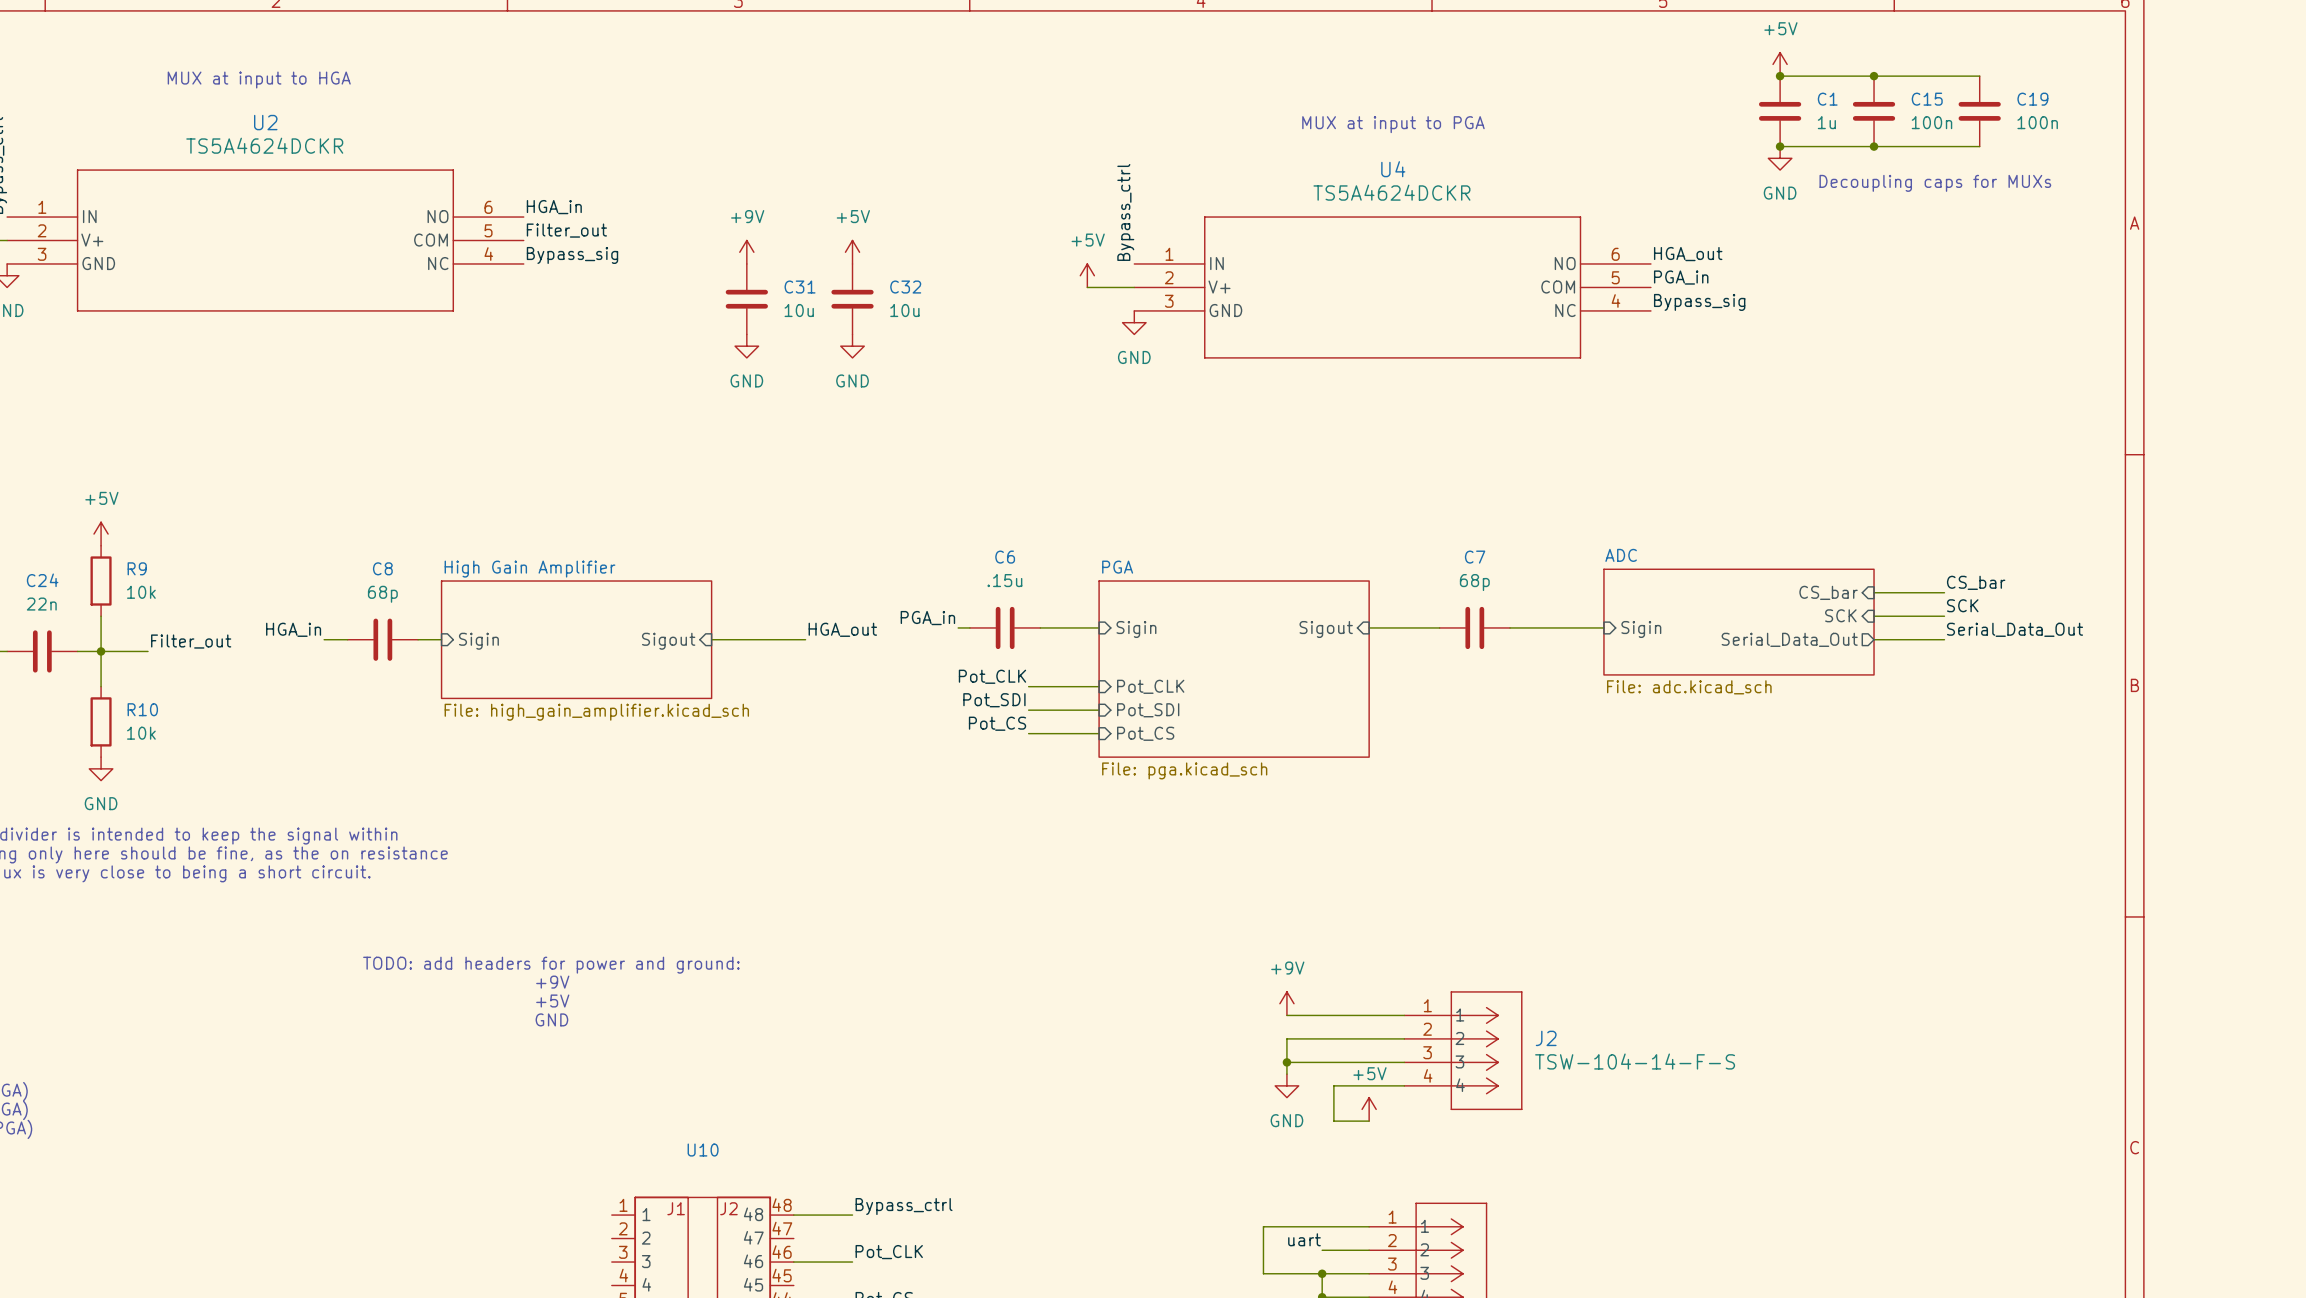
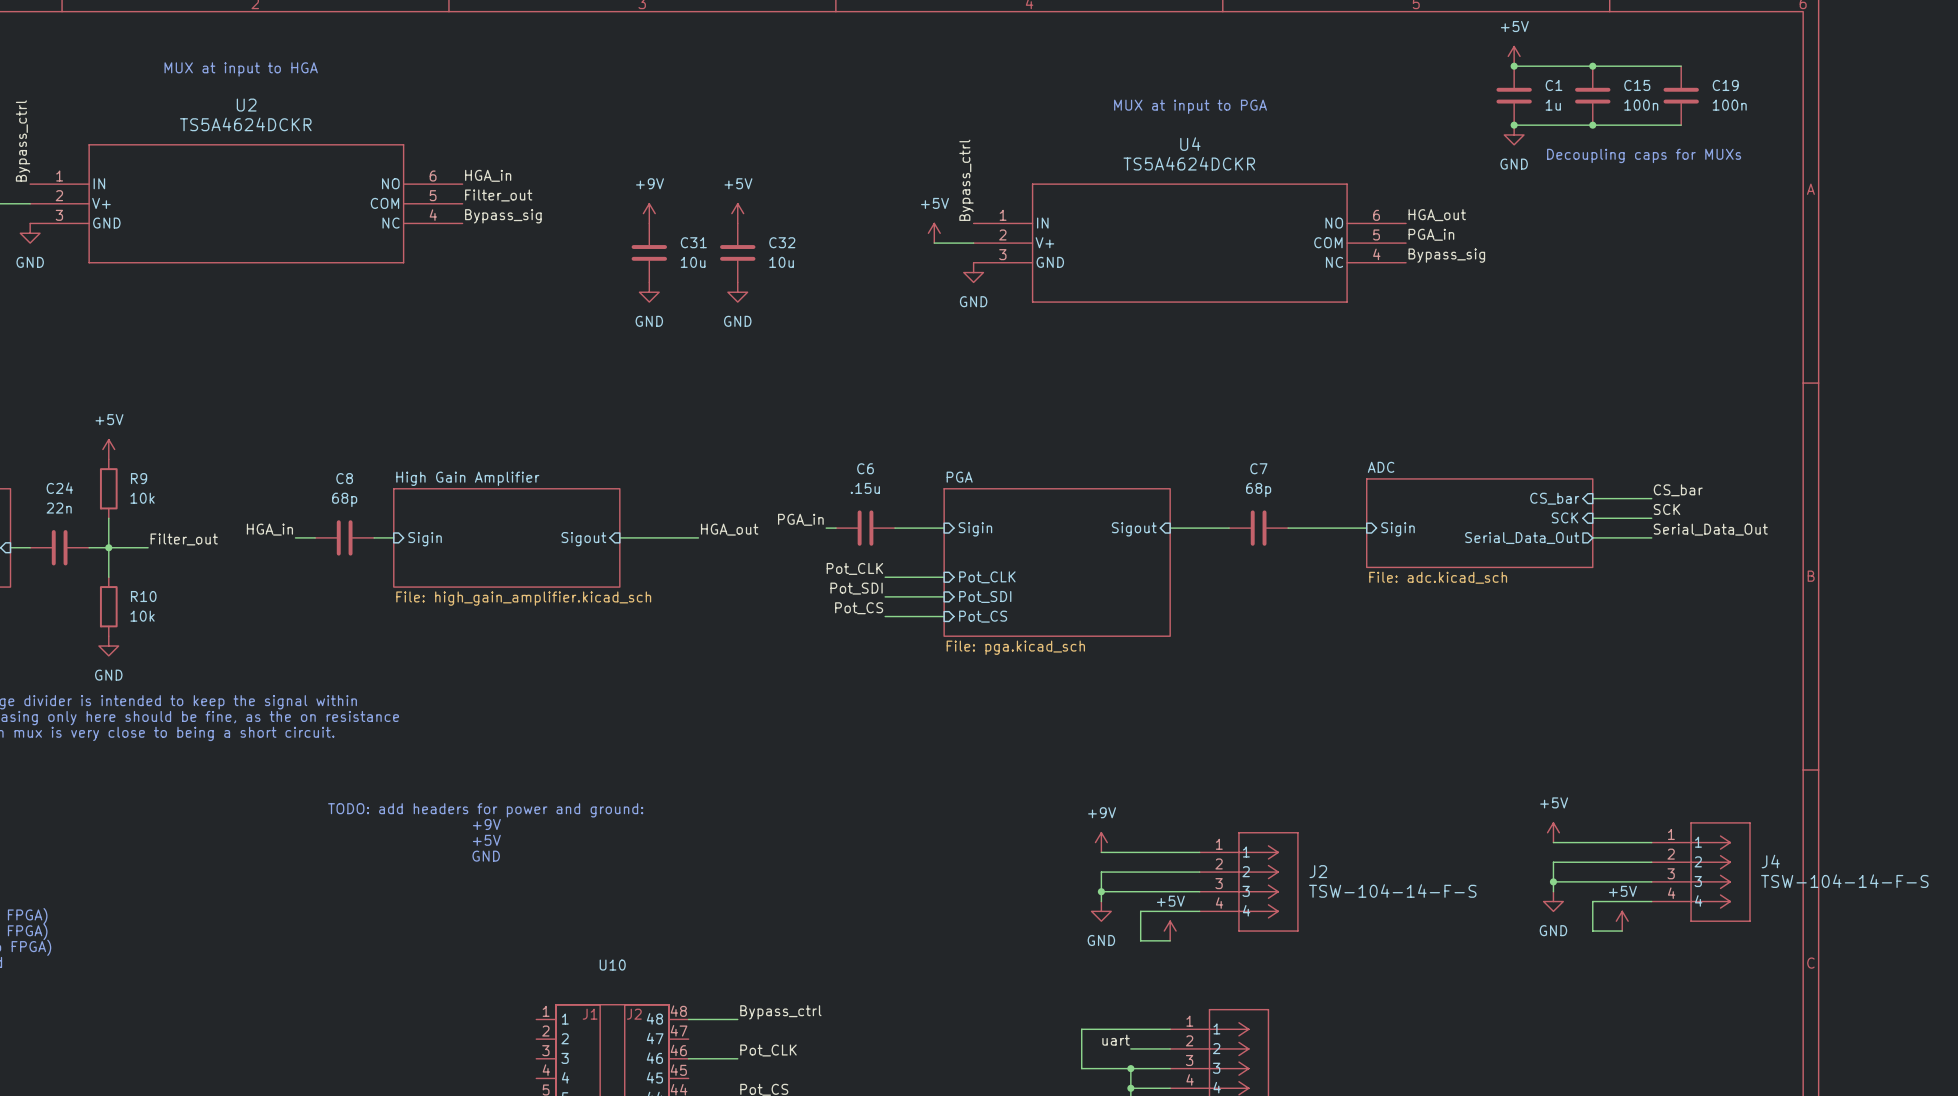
power symbol: none -> +5V (1553, 832)
wire: none -> (1553, 842) (1651, 842)
wire: none -> (1651, 862) (1553, 862) (1553, 891)
J4: none -> TSW-104-14-F-S (1701, 872)
wire: none -> (1553, 881) (1651, 881)
junction: none -> (1553, 881)
power symbol: none -> GND (1553, 901)
wire: none -> (1651, 901) (1592, 901) (1592, 931) (1622, 931)
power symbol: none -> +5V (1622, 921)

